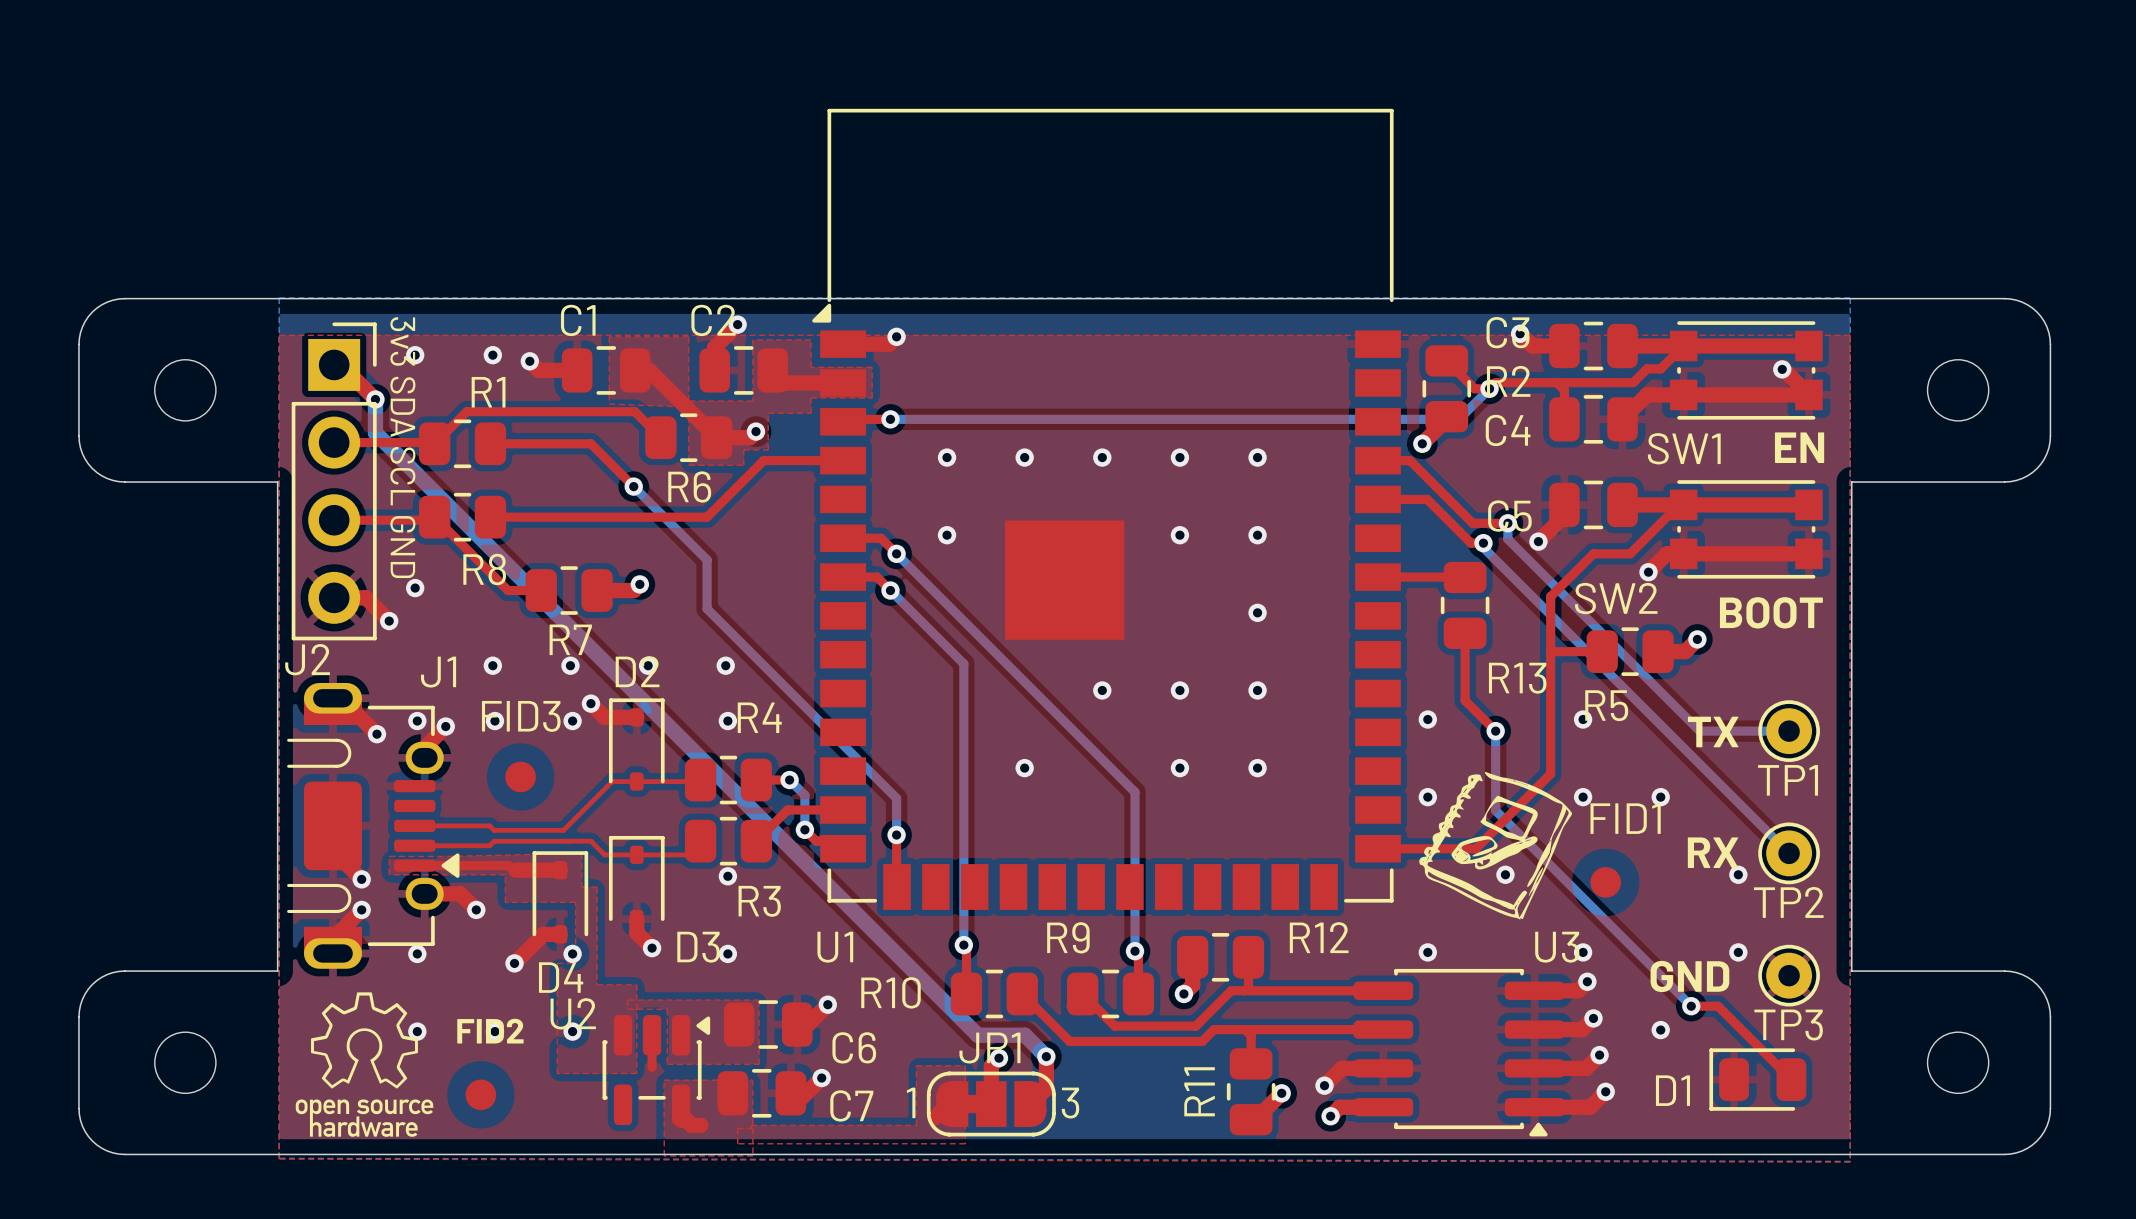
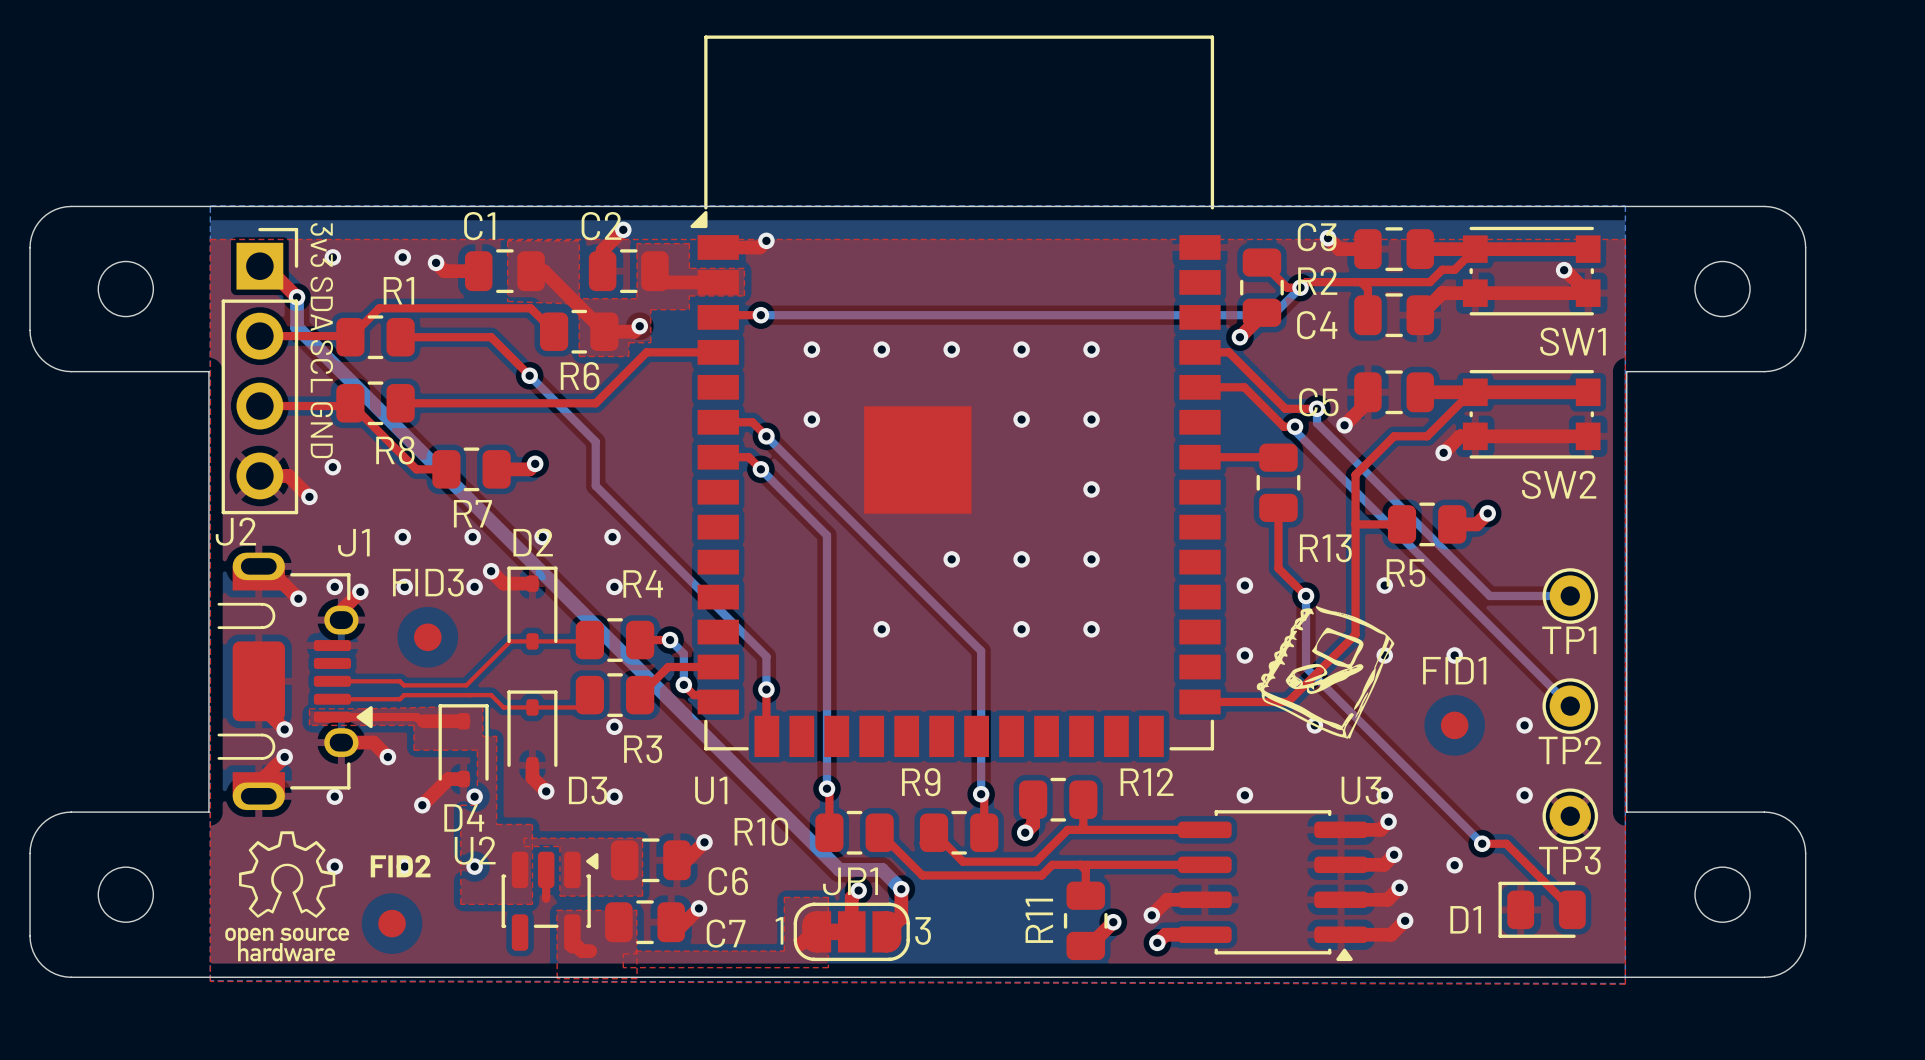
text: EN (1799, 447) -> none
SW1 name position: SW1 (1684, 448) -> SW1 (1572, 341)
SW2 name position: SW2 (1616, 598) -> SW2 (1559, 484)
text: BOOT (1771, 612) -> none
text: TX (1713, 731) -> none
FID1 name position: FID1 (1625, 818) -> FID1 (1454, 670)
drawing position: (1495, 845) -> (1325, 672)
text: RX (1713, 852) -> none
FID1 position: (1605, 882) -> (1454, 725)
text: GND (1689, 976) -> none

